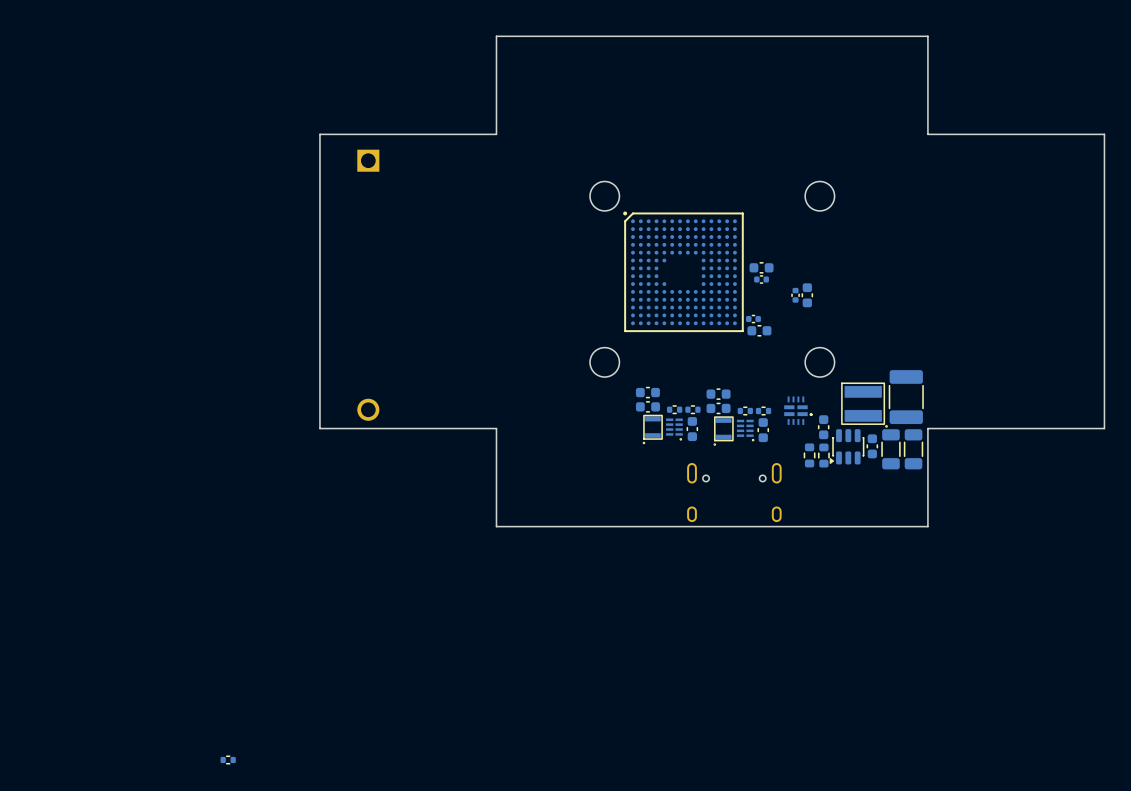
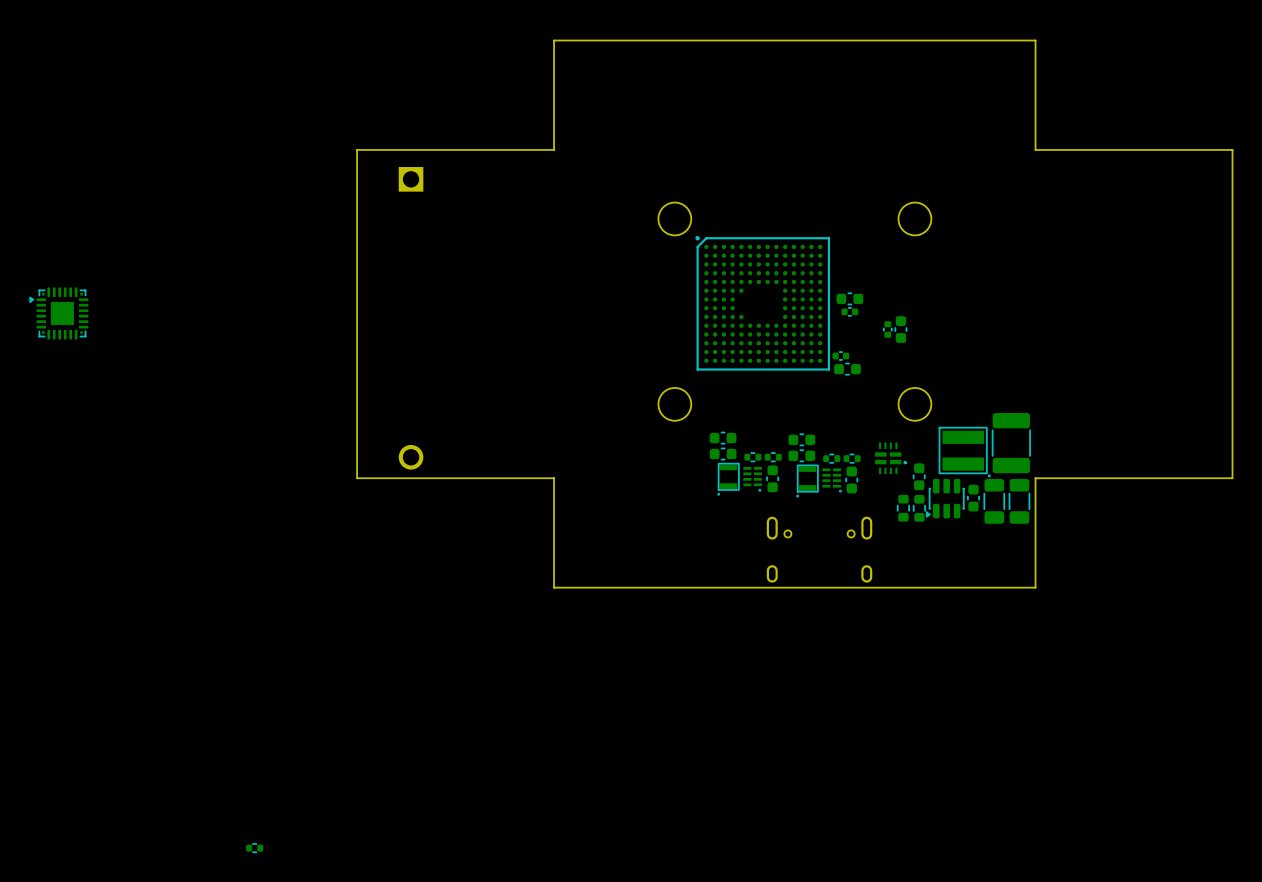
part: none -> (58, 313)

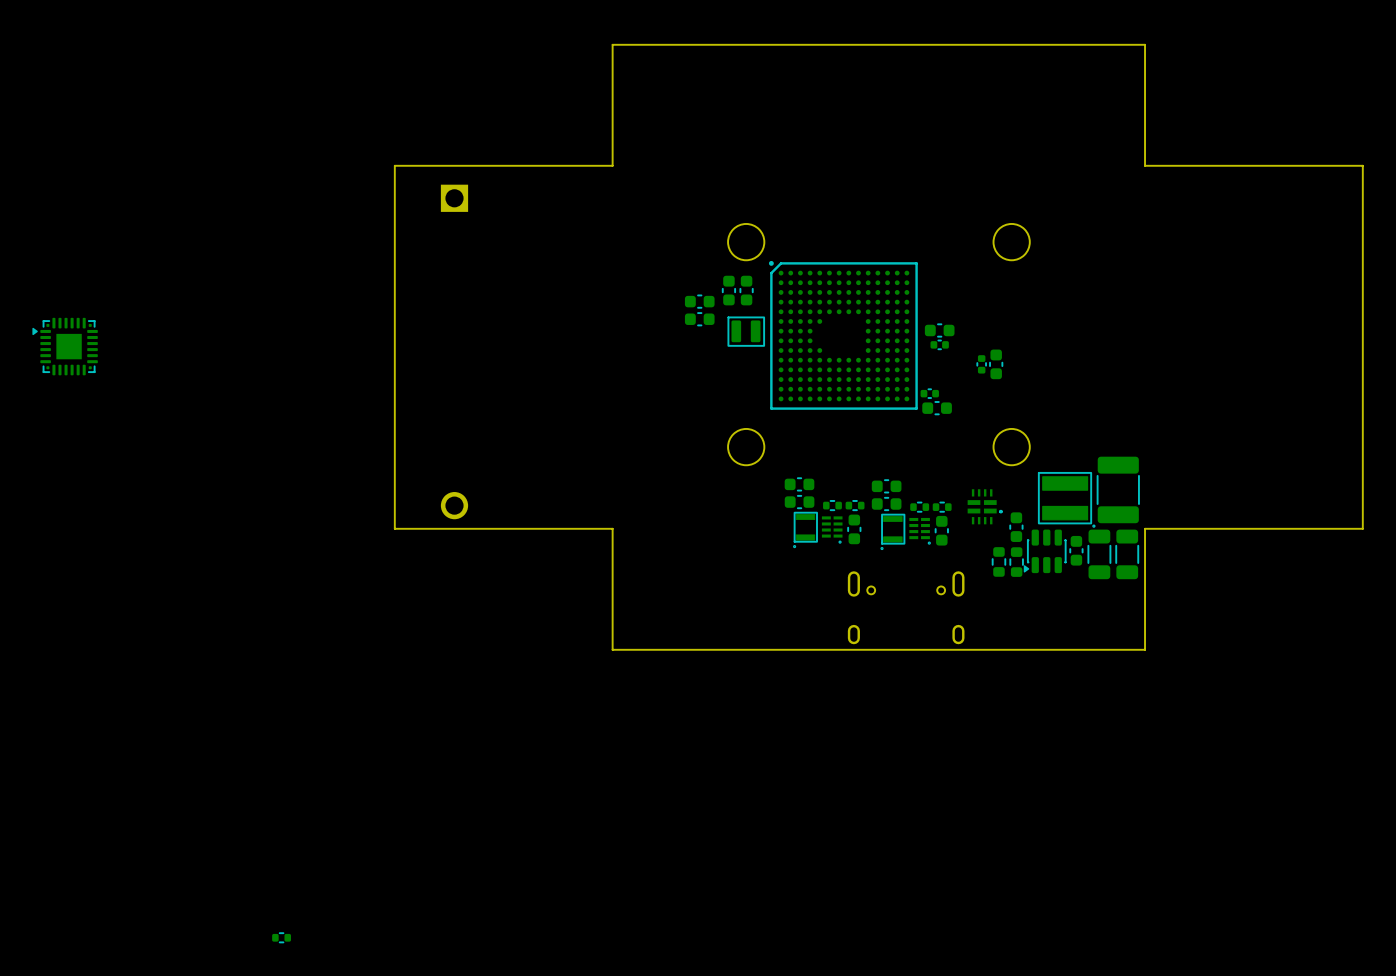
part: none -> (728, 290)
part: none -> (746, 290)
part: none -> (699, 301)
part: none -> (699, 319)
part: none -> (746, 331)

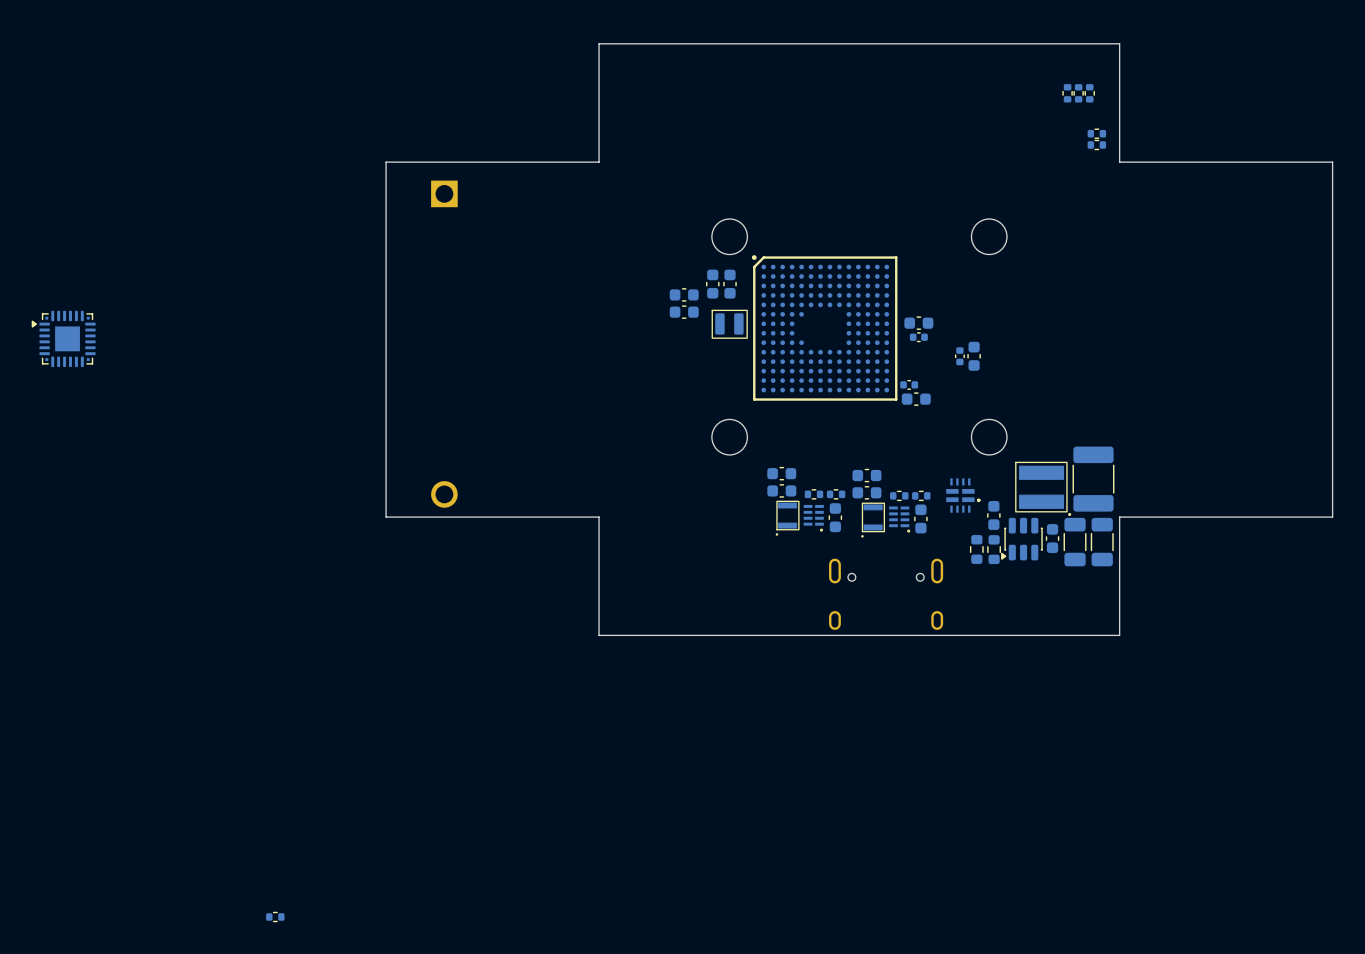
part: none -> (1067, 93)
part: none -> (1078, 93)
part: none -> (1089, 93)
part: none -> (1096, 133)
part: none -> (1096, 144)

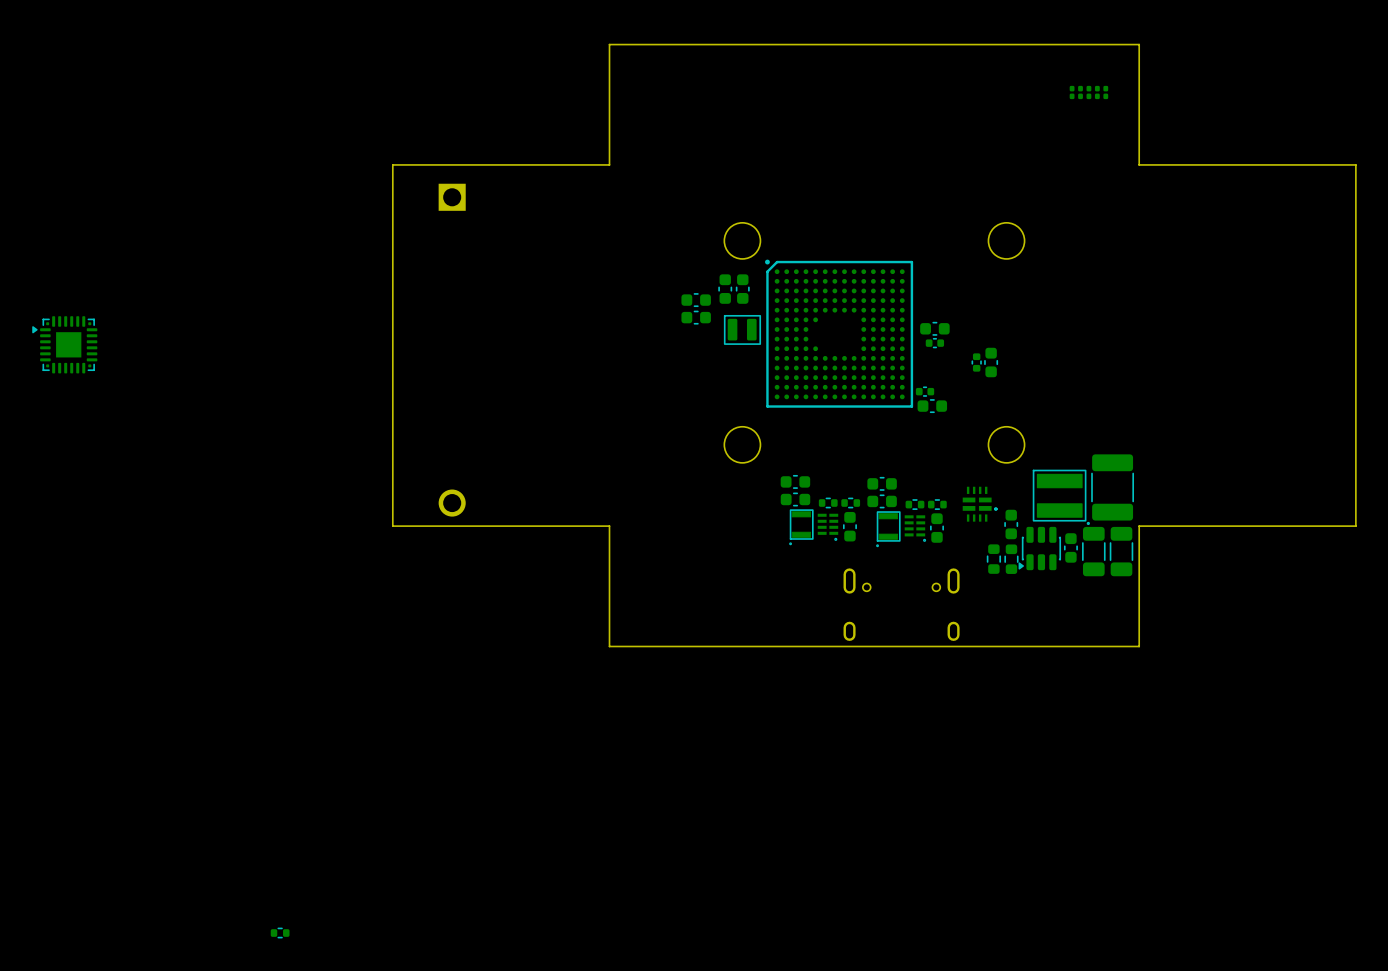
part footprint: [1073, 84, 1084, 103] -> [1094, 85, 1100, 100]
part footprint: [1084, 84, 1095, 103] -> [1103, 85, 1109, 100]
part: none -> (1072, 92)
part: none -> (1080, 92)
part: none -> (1088, 92)
part: (1067, 93) -> none
part: (1096, 133) -> none
part: (1096, 144) -> none

